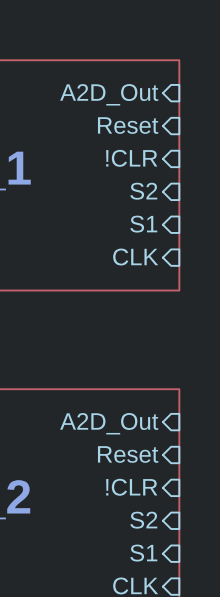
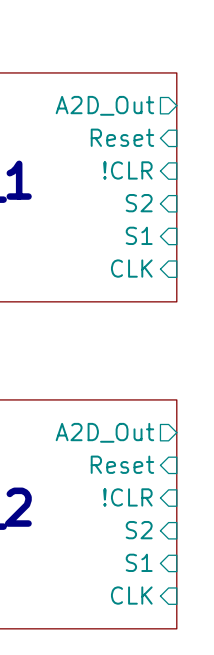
sheet pin shape: input (109, 94) -> output (104, 105)
sheet pin shape: input (109, 423) -> output (104, 432)

